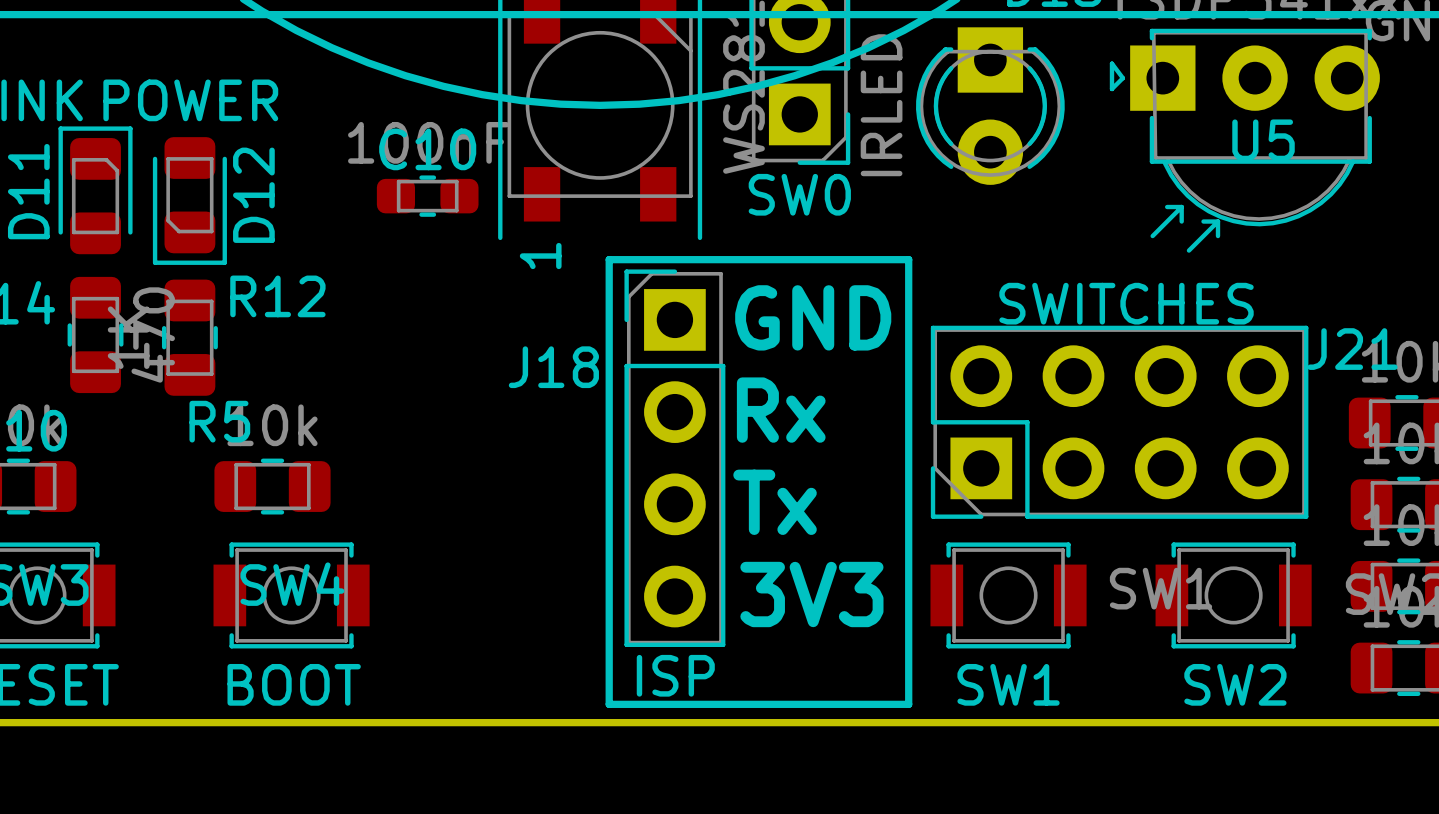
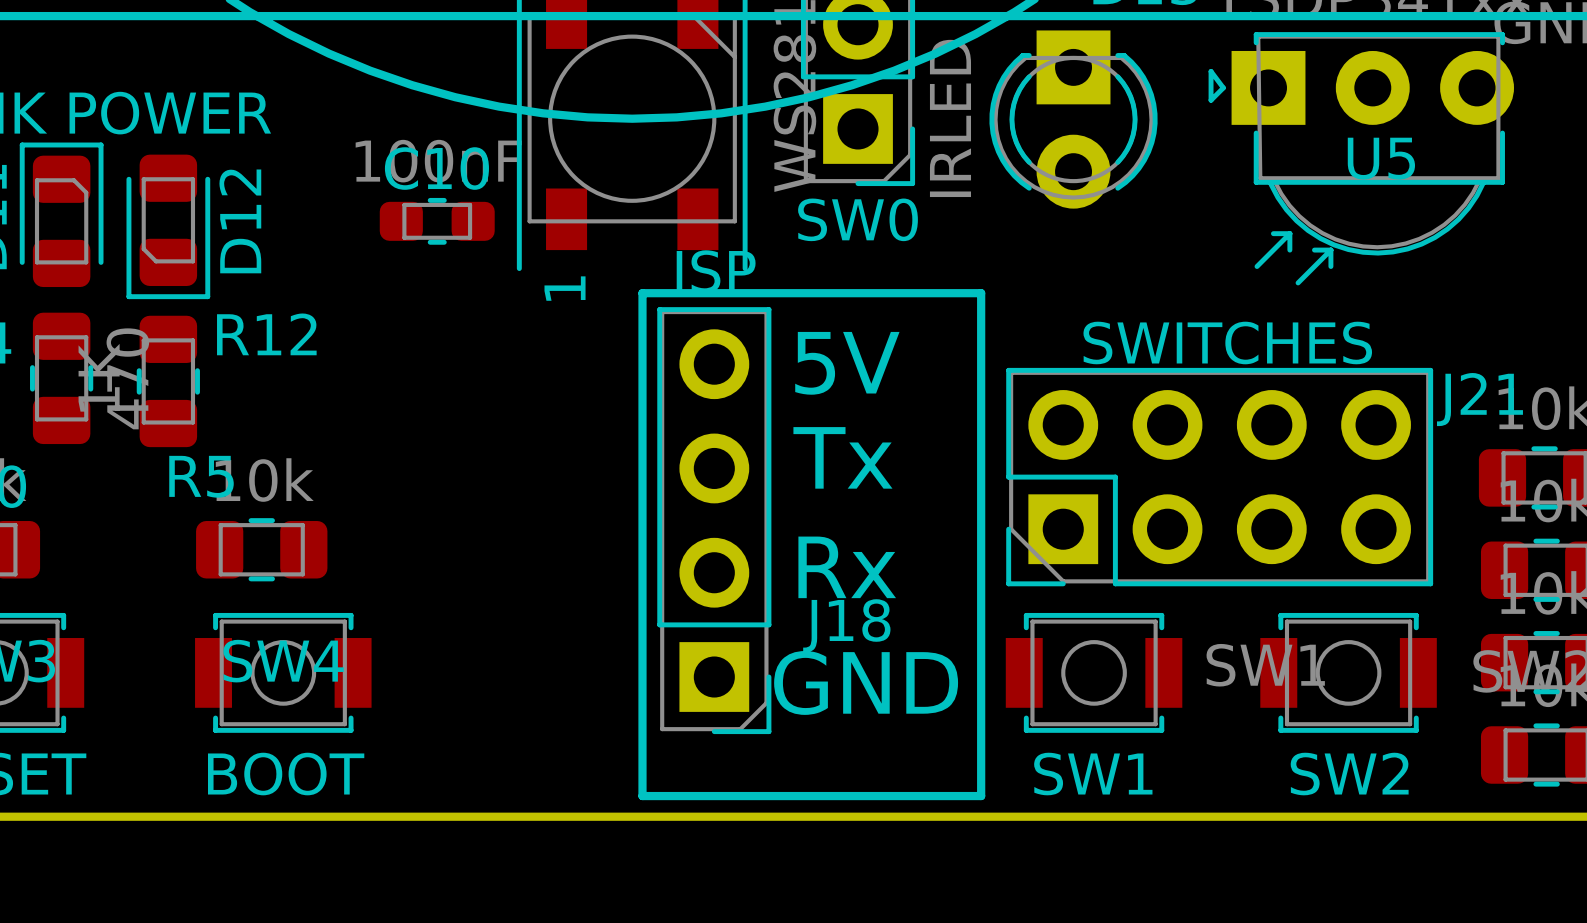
text: GND (813, 317) -> 5V (847, 363)
text: Rx (781, 410) -> Tx (842, 457)
J18 rotation: 0° (674, 458) -> 180° (714, 520)
text: Tx (775, 502) -> Rx (847, 567)
text: 3V3 (811, 594) -> GND (866, 682)

